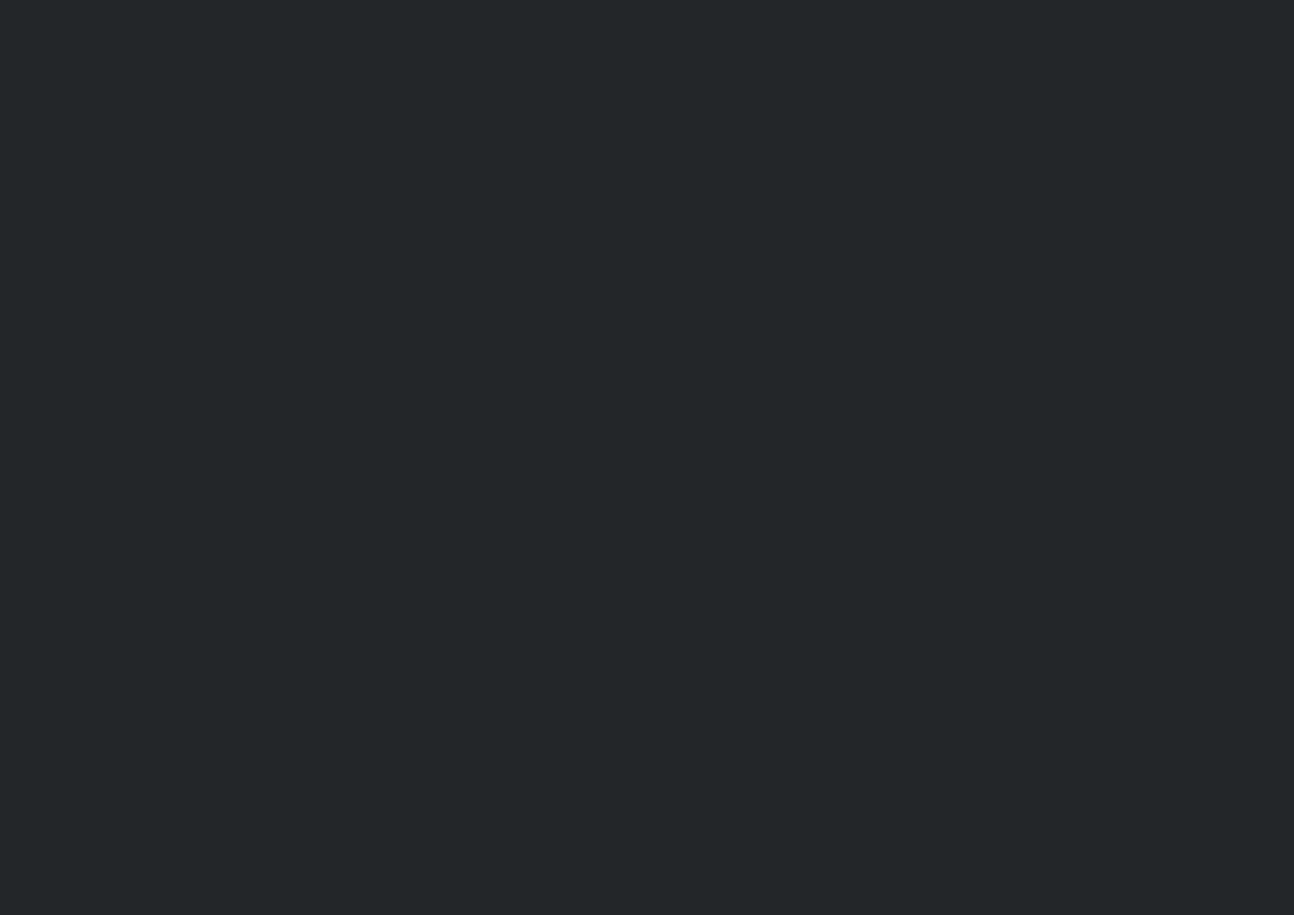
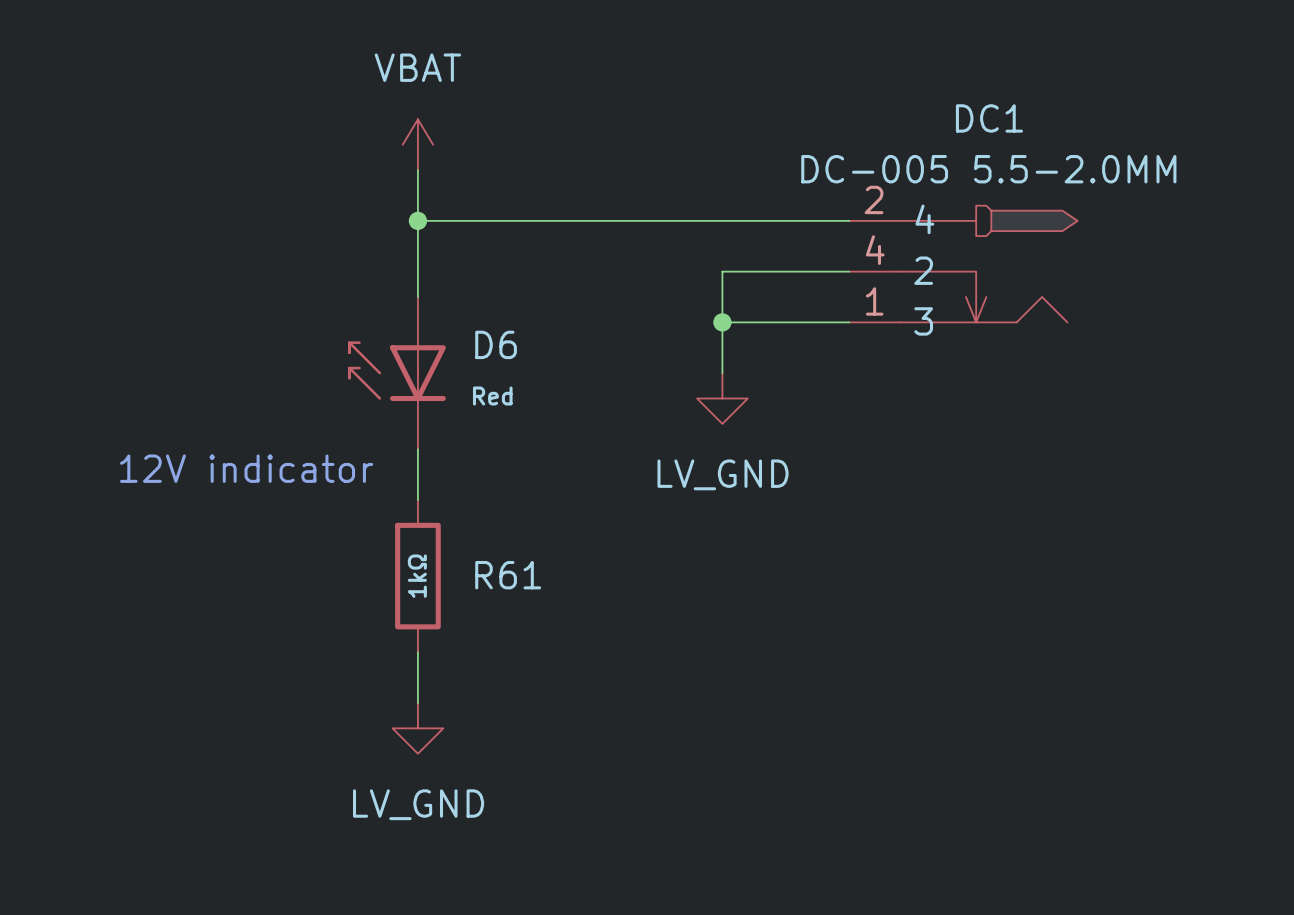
power symbol: none -> VBAT (417, 144)
wire: none -> (417, 170) (417, 297)
wire: none -> (417, 220) (849, 220)
junction: none -> (417, 220)
DC1: none -> DC-005 5.5-2.0MM (963, 264)
wire: none -> (849, 271) (722, 271) (722, 373)
wire: none -> (722, 322) (849, 322)
junction: none -> (722, 322)
D6: none -> Red (397, 373)
power symbol: none -> LV_GND (722, 398)
wire: none -> (417, 449) (417, 499)
text: none -> 12V indicator (246, 468)
R61: none -> 1kΩ (417, 576)
wire: none -> (417, 652) (417, 702)
power symbol: none -> LV_GND (417, 728)

